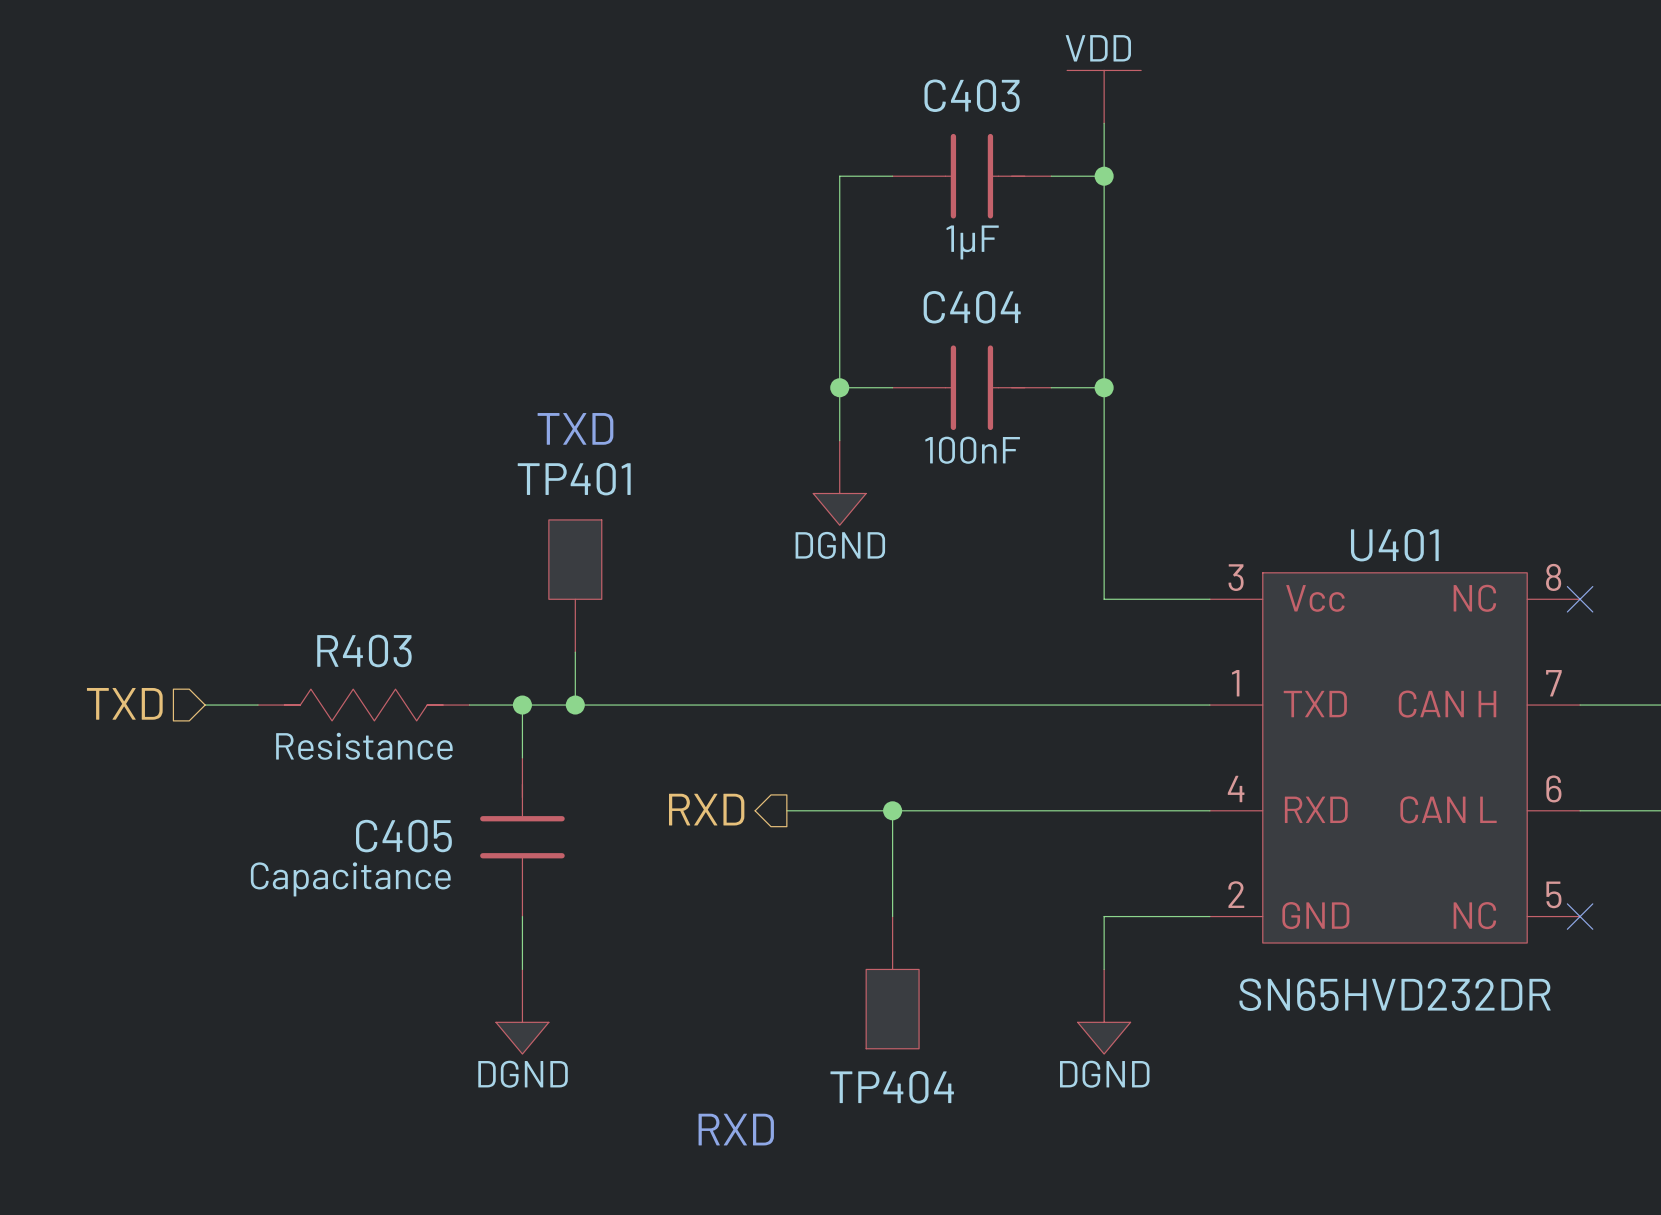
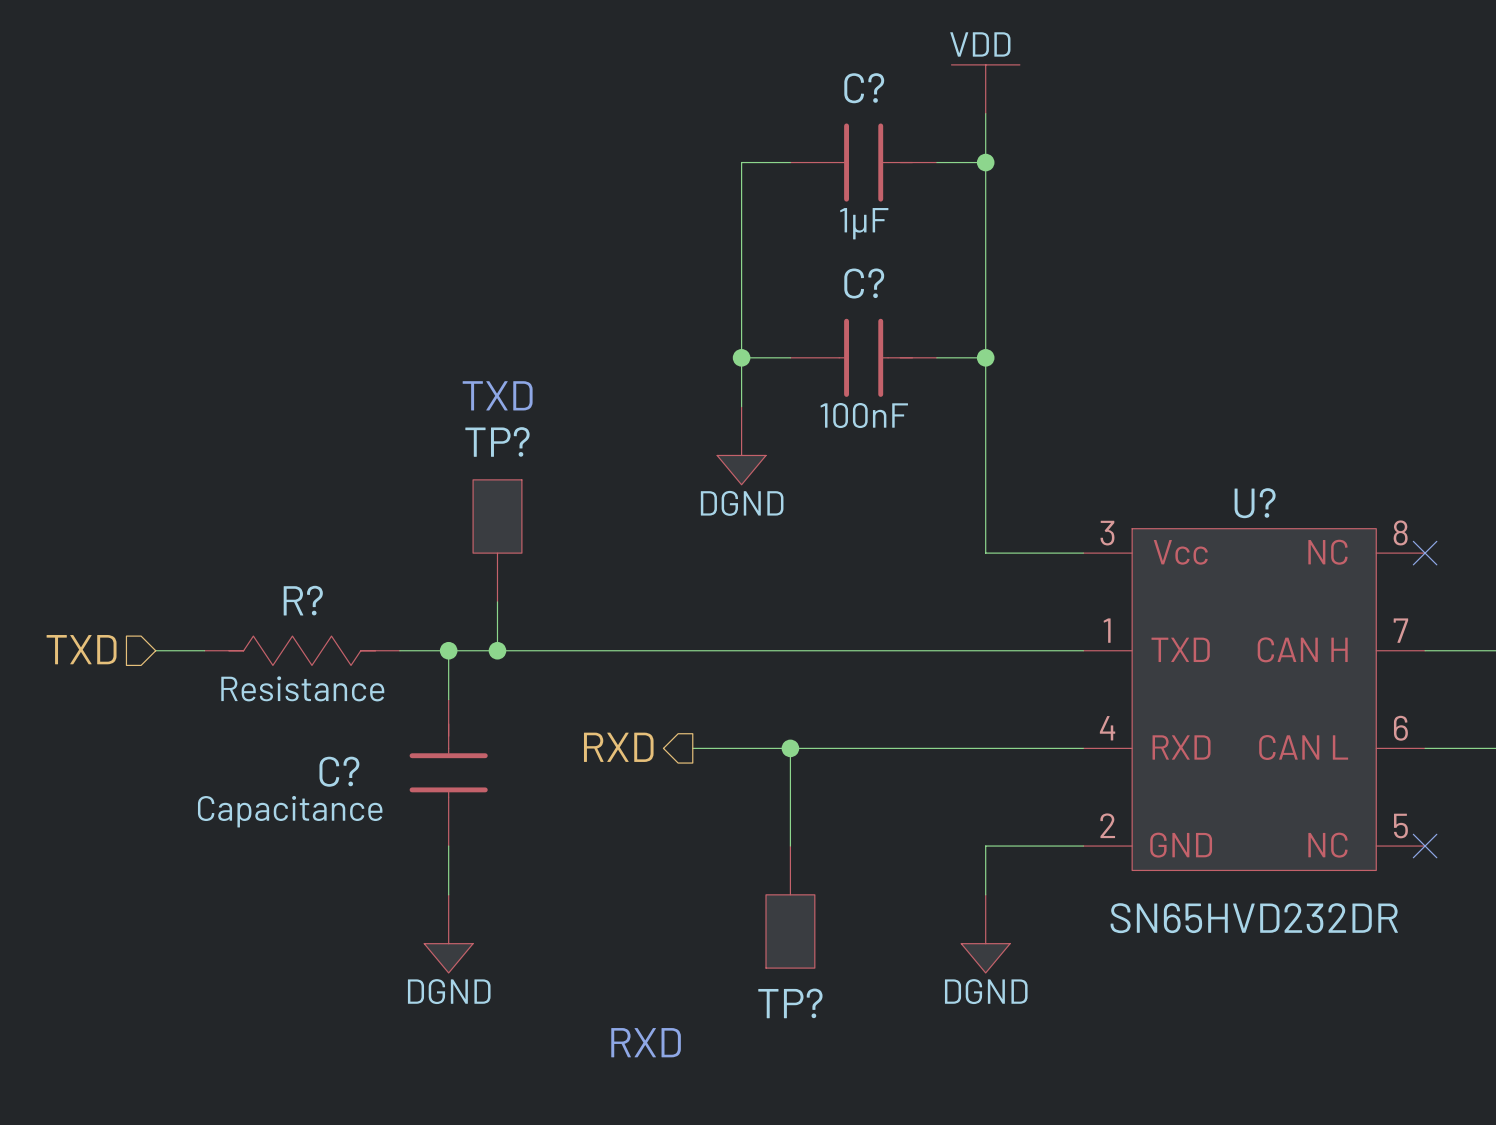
C403 name: C403 (972, 95) -> C? (864, 88)
C404 name: C404 (972, 307) -> C? (864, 283)
TP401 name: TP401 (574, 479) -> TP? (497, 441)
U401 name: U401 (1394, 545) -> U? (1255, 503)
R403 name: R403 (364, 650) -> R? (303, 600)
C405 name: C405 (403, 836) -> C? (339, 771)
TP404 name: TP404 (892, 1087) -> TP? (790, 1003)

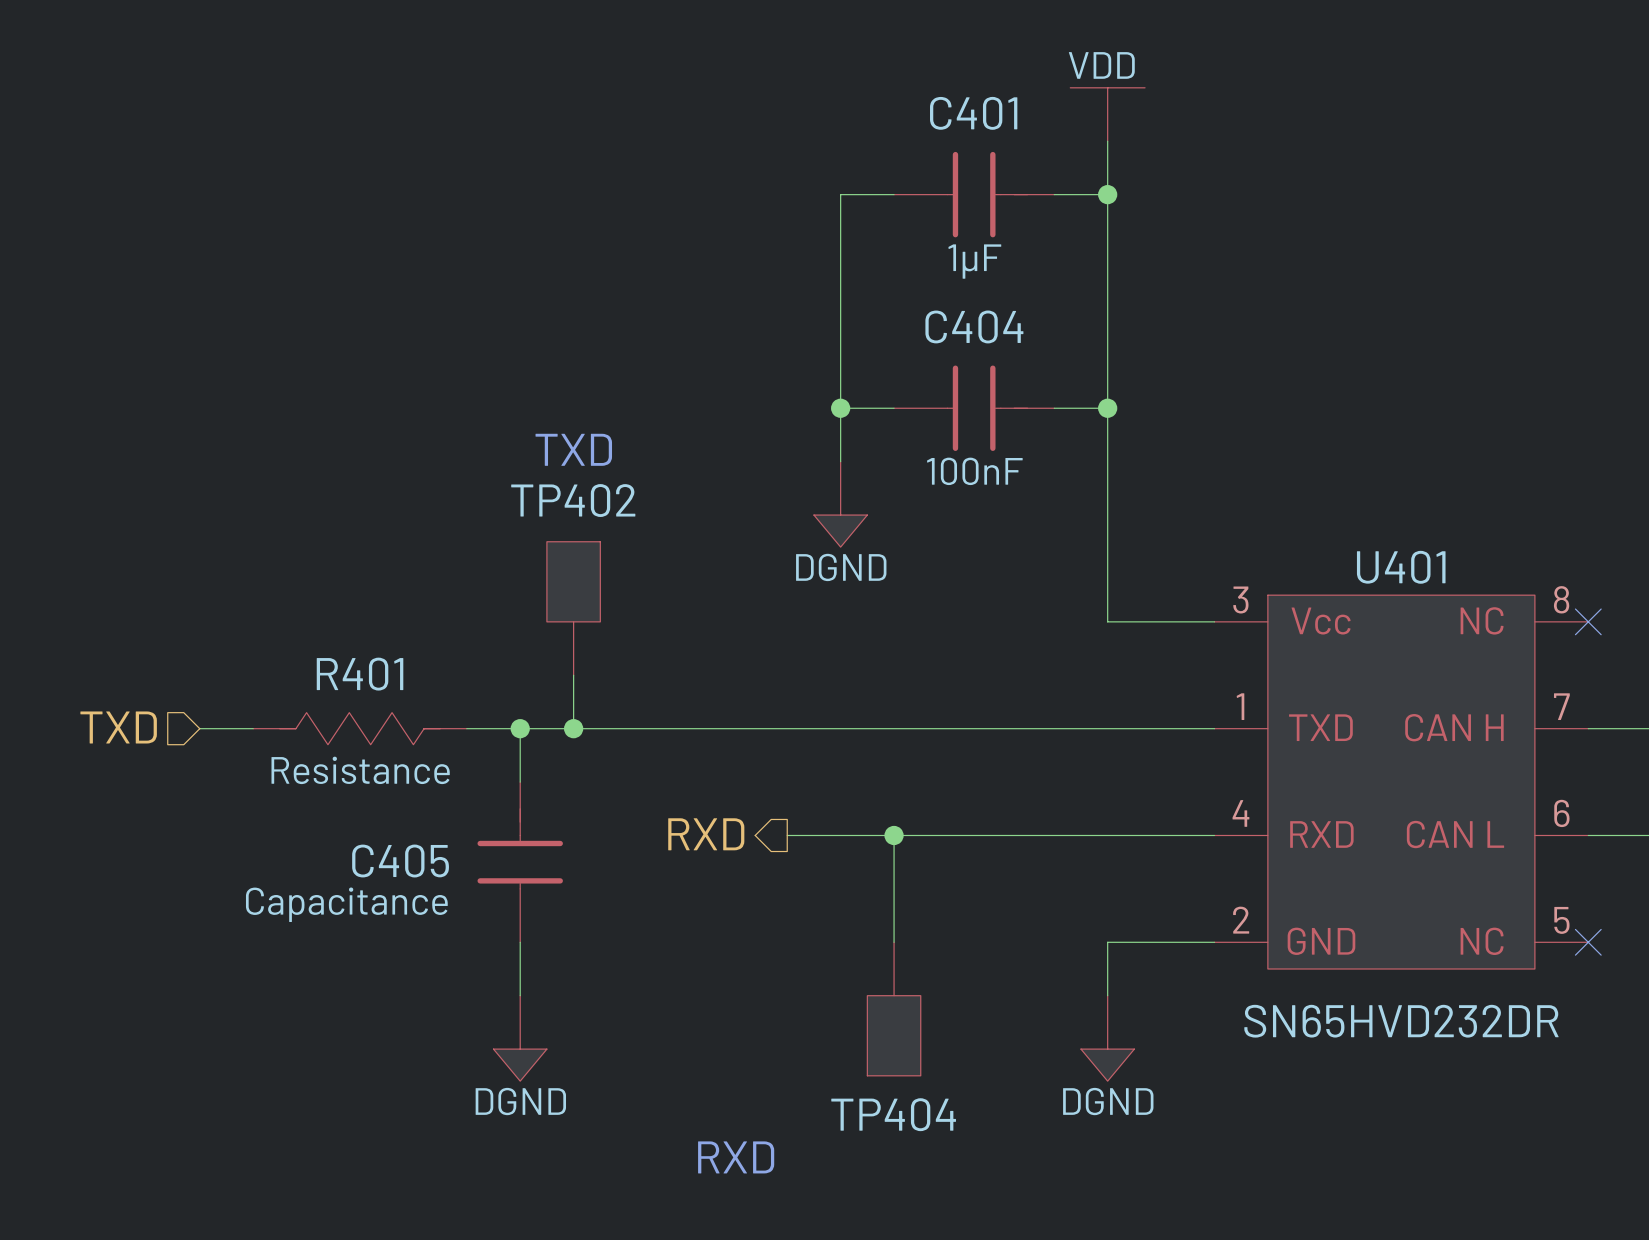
C? name: C? (864, 88) -> C401 (973, 113)
C? name: C? (864, 283) -> C404 (974, 326)
TP? name: TP? (497, 441) -> TP402 (573, 500)
U? name: U? (1255, 503) -> U401 (1401, 567)
R? name: R? (303, 600) -> R401 (360, 674)
C? name: C? (339, 771) -> C405 (400, 861)
TP? name: TP? (790, 1003) -> TP404 (893, 1114)

